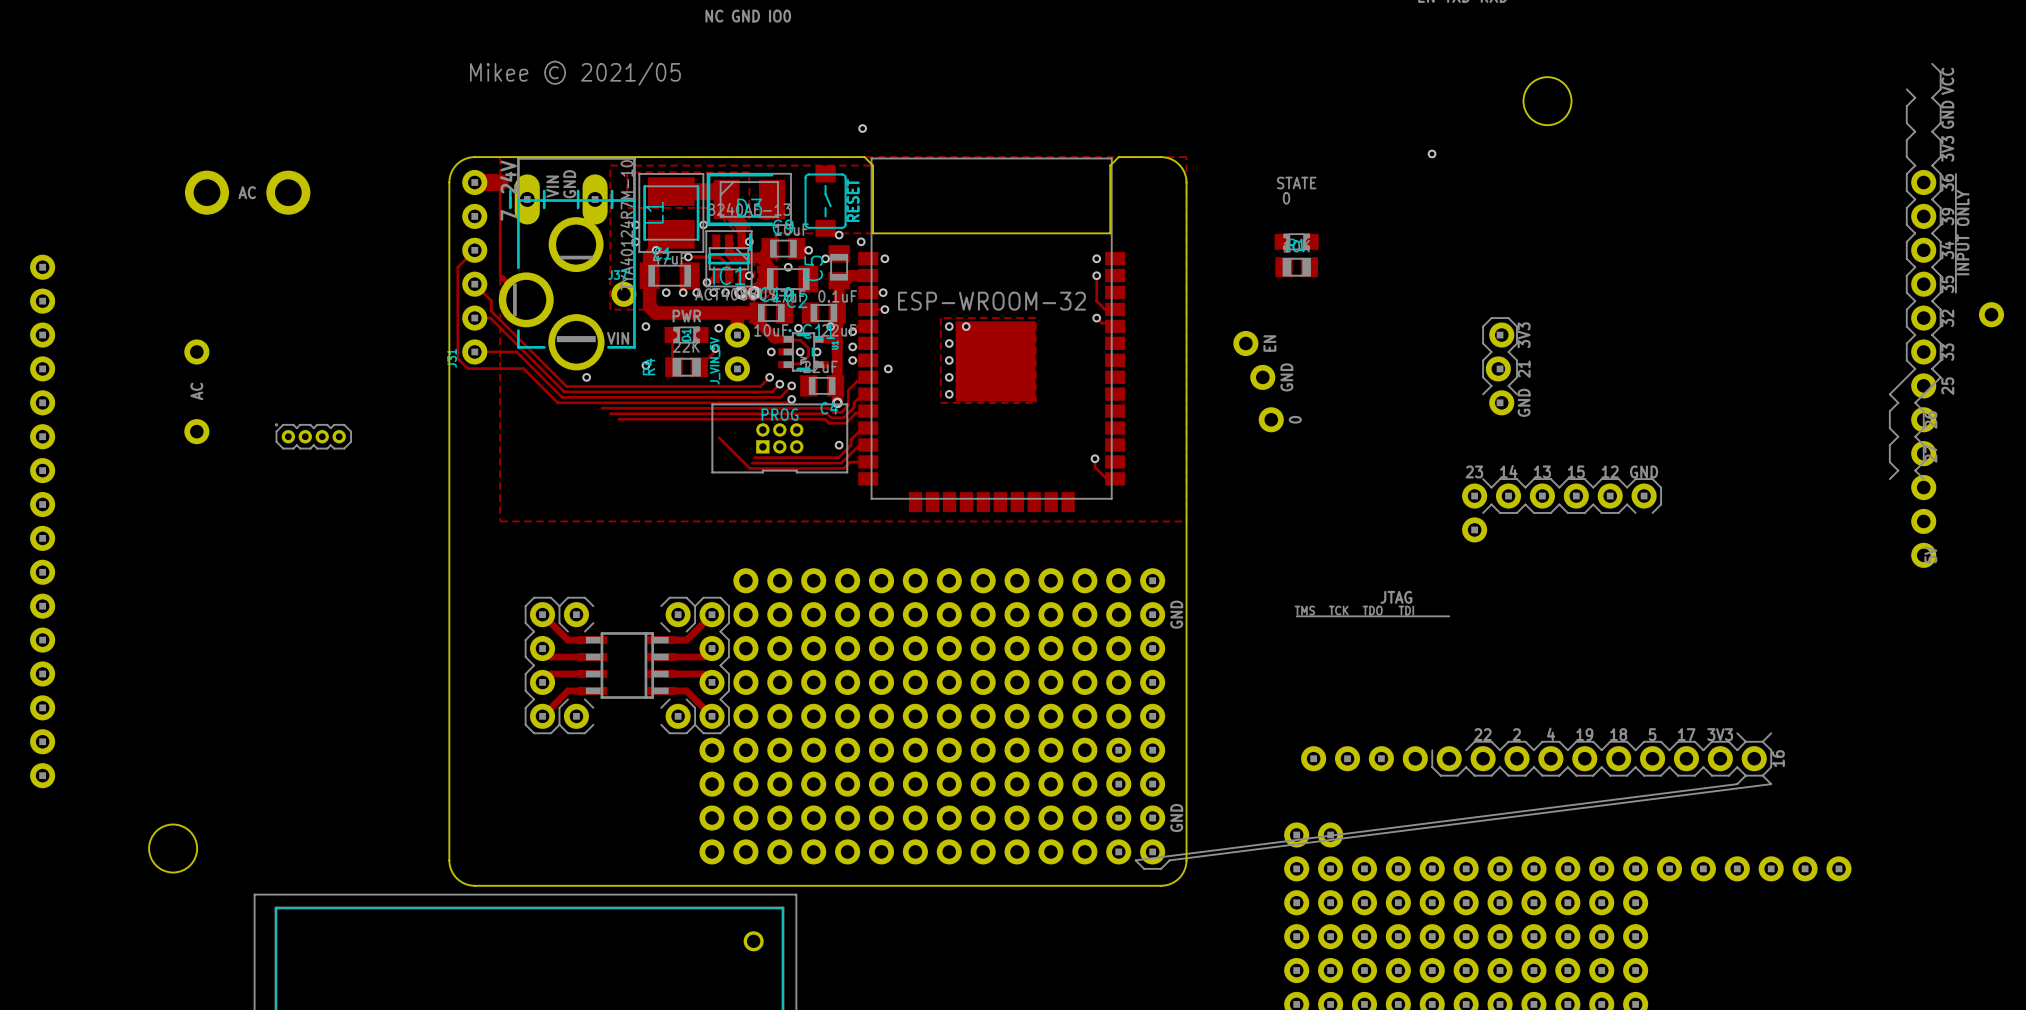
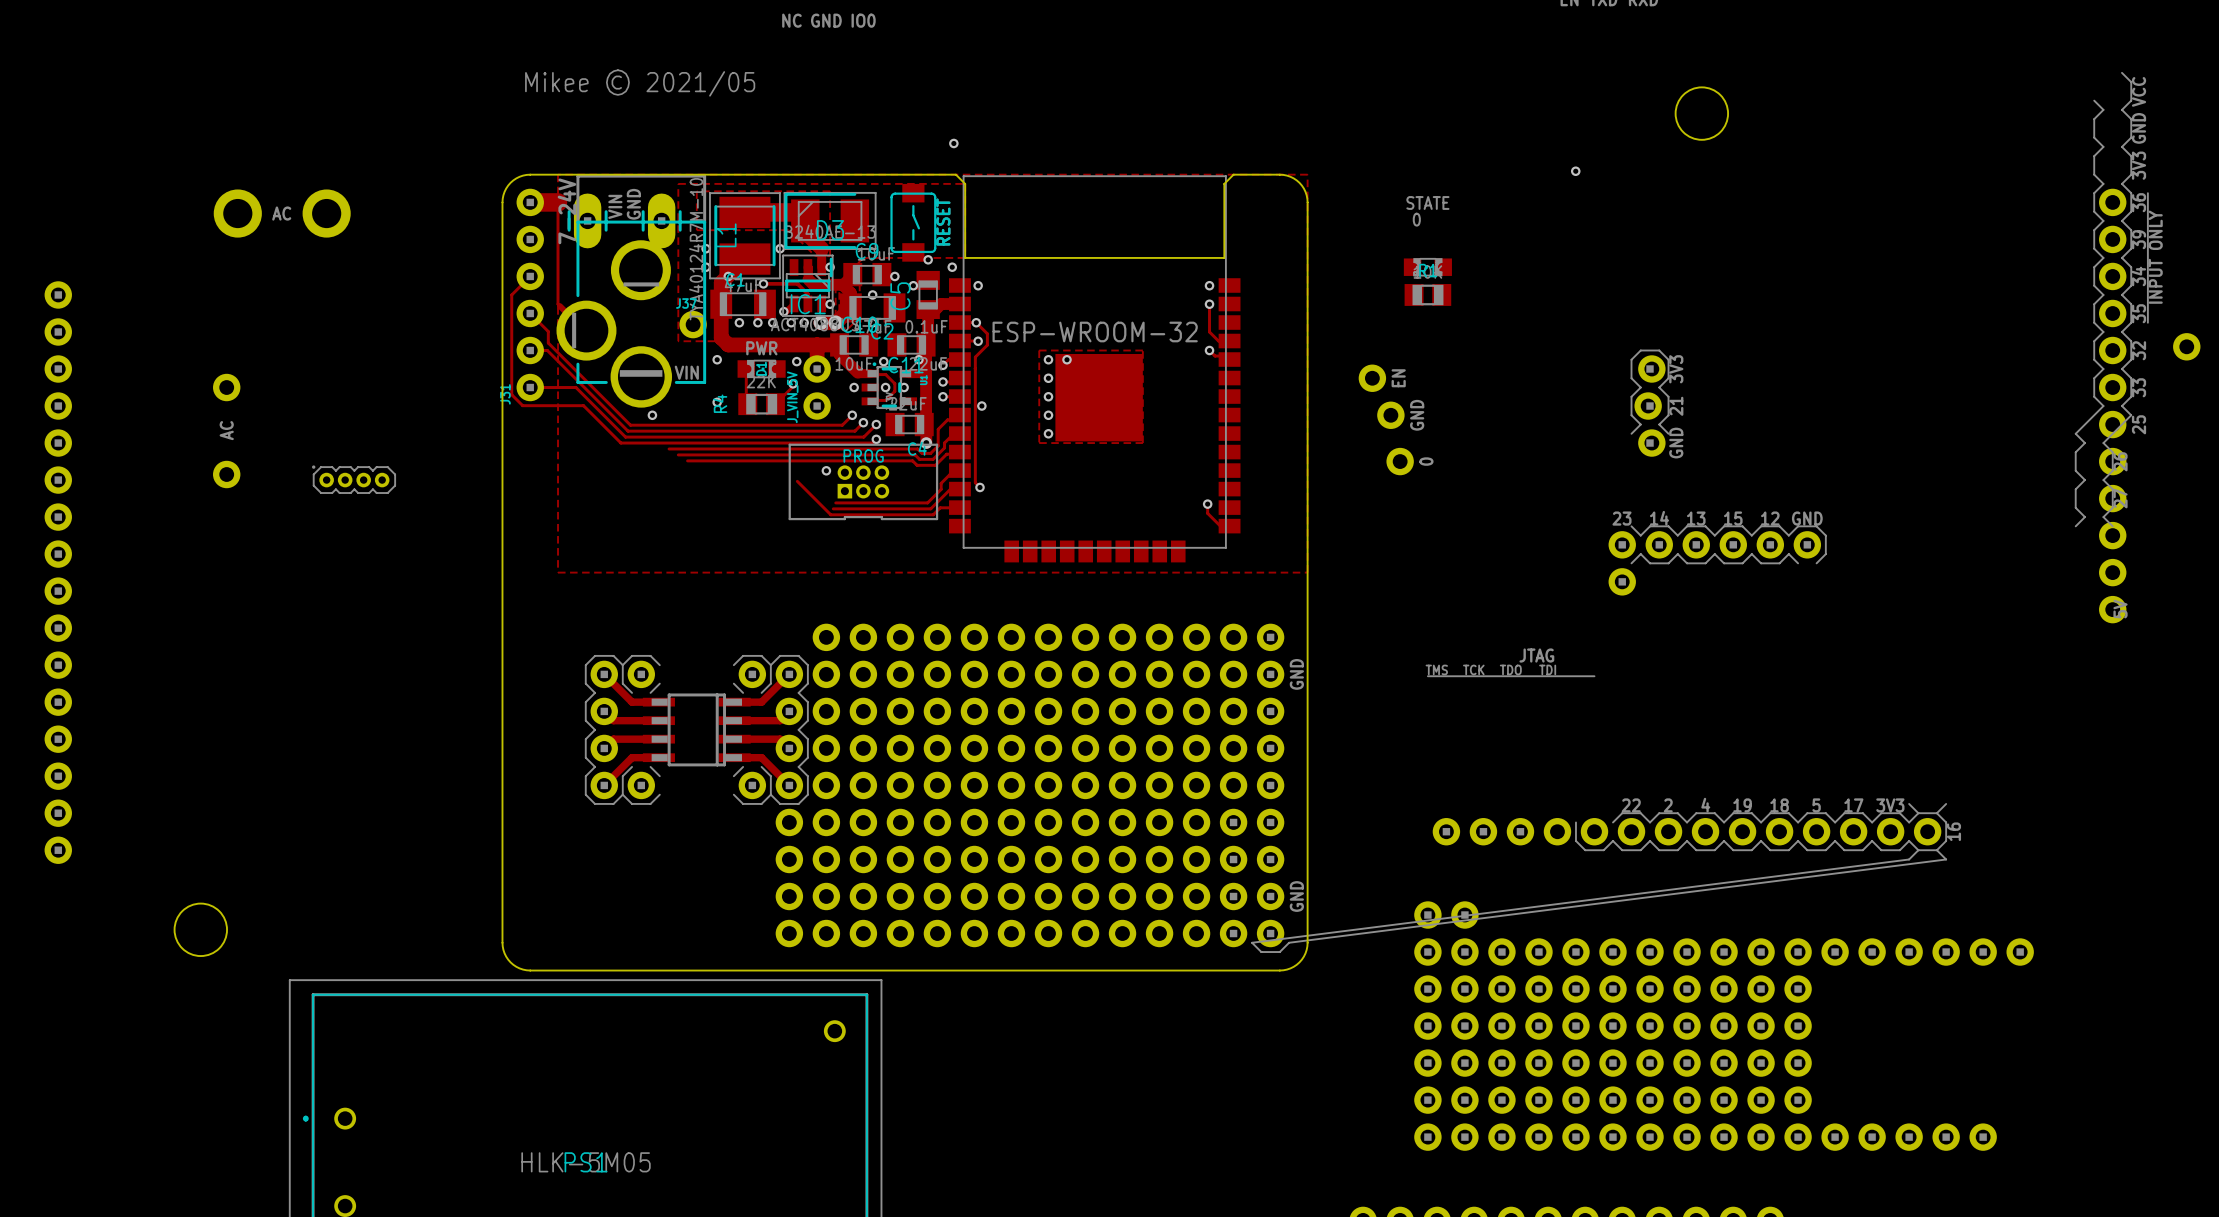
track: none -> (976, 322) (987, 333) (987, 345) (975, 357) (975, 368)
track: none -> (975, 368) (975, 482) (980, 487)
via: none -> (826, 470)
via: none -> (980, 487)
via: (839, 445) -> none

